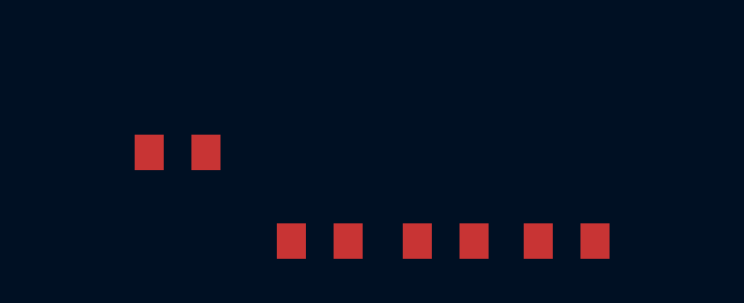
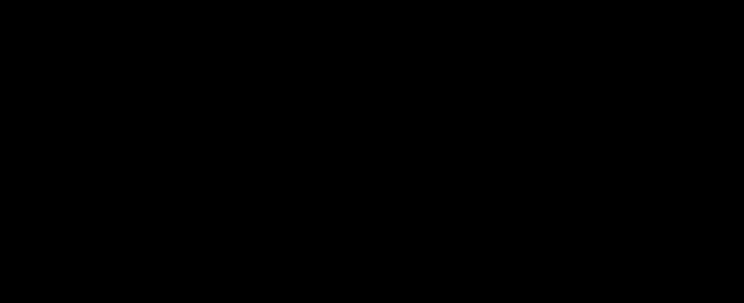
part: (177, 152) -> none
part: (319, 241) -> none
part: (445, 241) -> none
part: (566, 241) -> none

